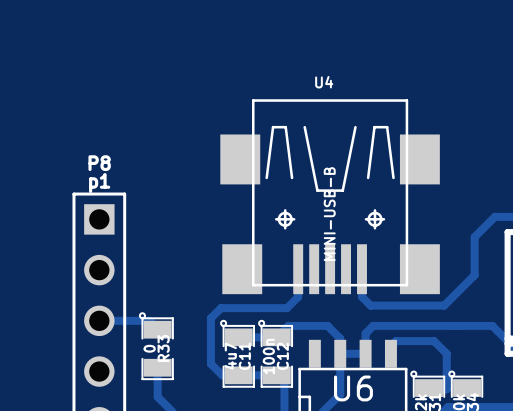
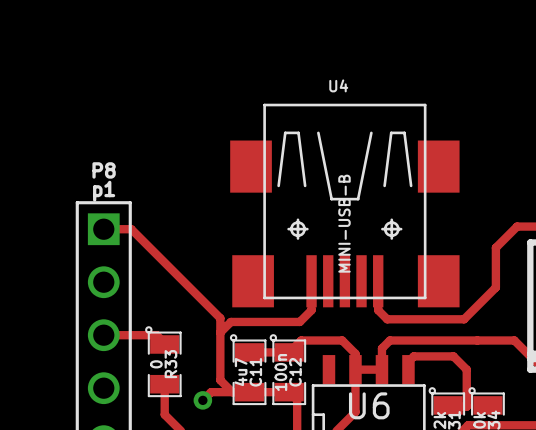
track: none -> (103, 229) (131, 229) (220, 318) (220, 332)
track: none -> (232, 392) (211, 392) (202, 400)
via: none -> (202, 400)

